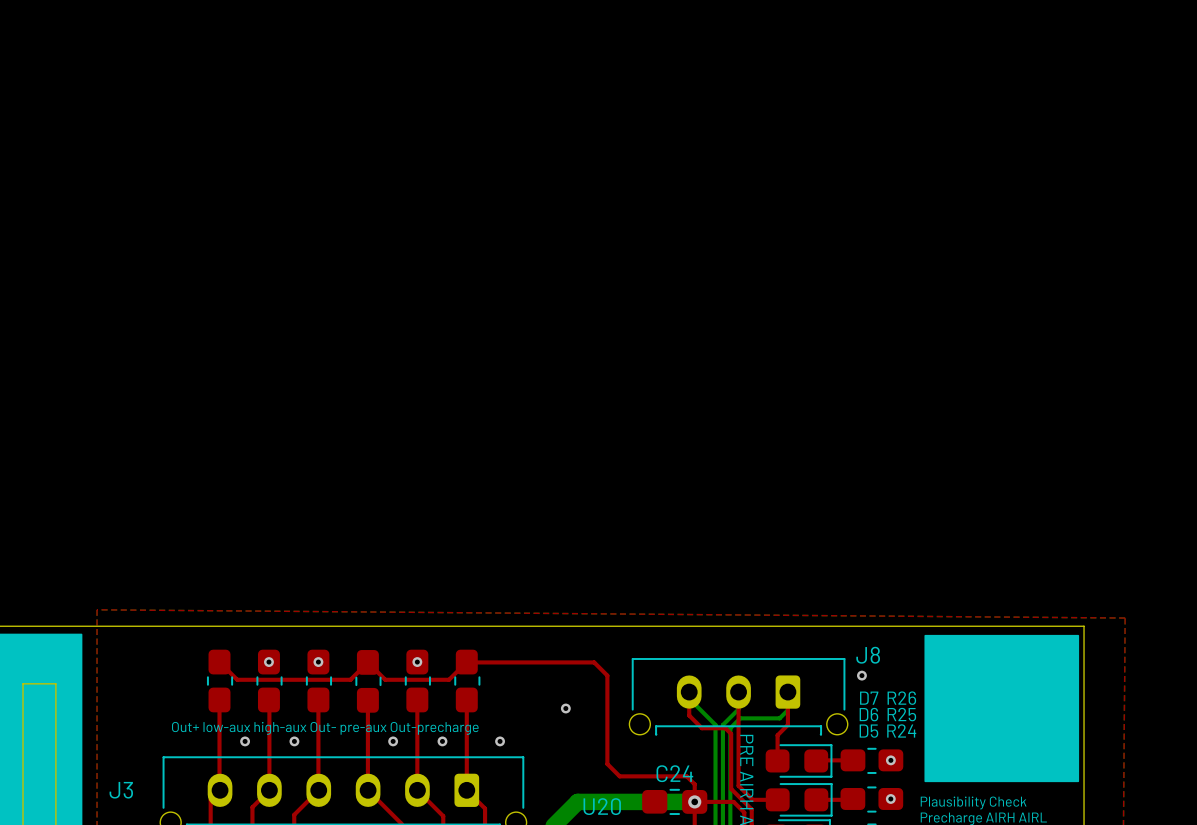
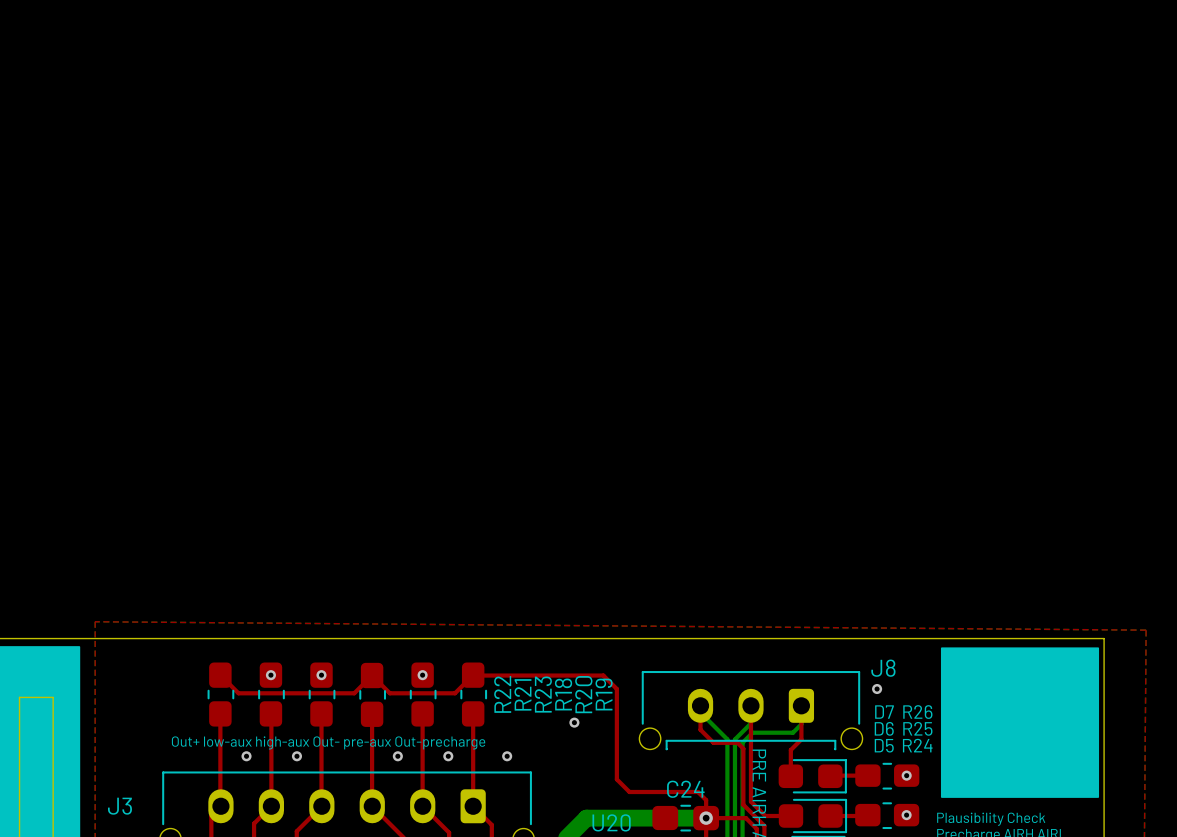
R22 name: none -> R22 (502, 694)
R18 name: none -> R18 (563, 694)
R21 name: none -> R21 (522, 694)
R23 name: none -> R23 (543, 694)
R20 name: none -> R20 (583, 694)
R19 name: none -> R19 (604, 694)

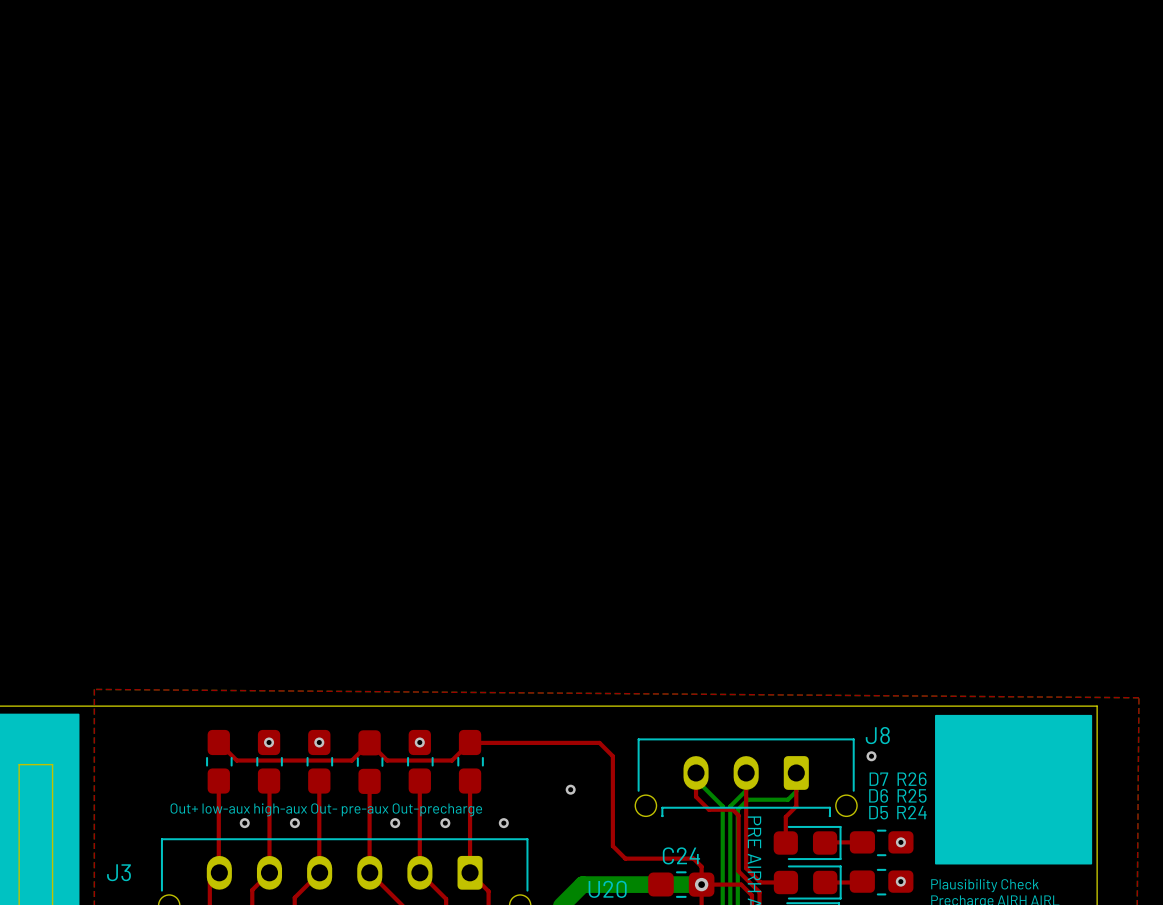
R22 name: R22 (502, 694) -> none
R21 name: R21 (522, 694) -> none
R23 name: R23 (543, 694) -> none
R18 name: R18 (563, 694) -> none
R20 name: R20 (583, 694) -> none
R19 name: R19 (604, 694) -> none

